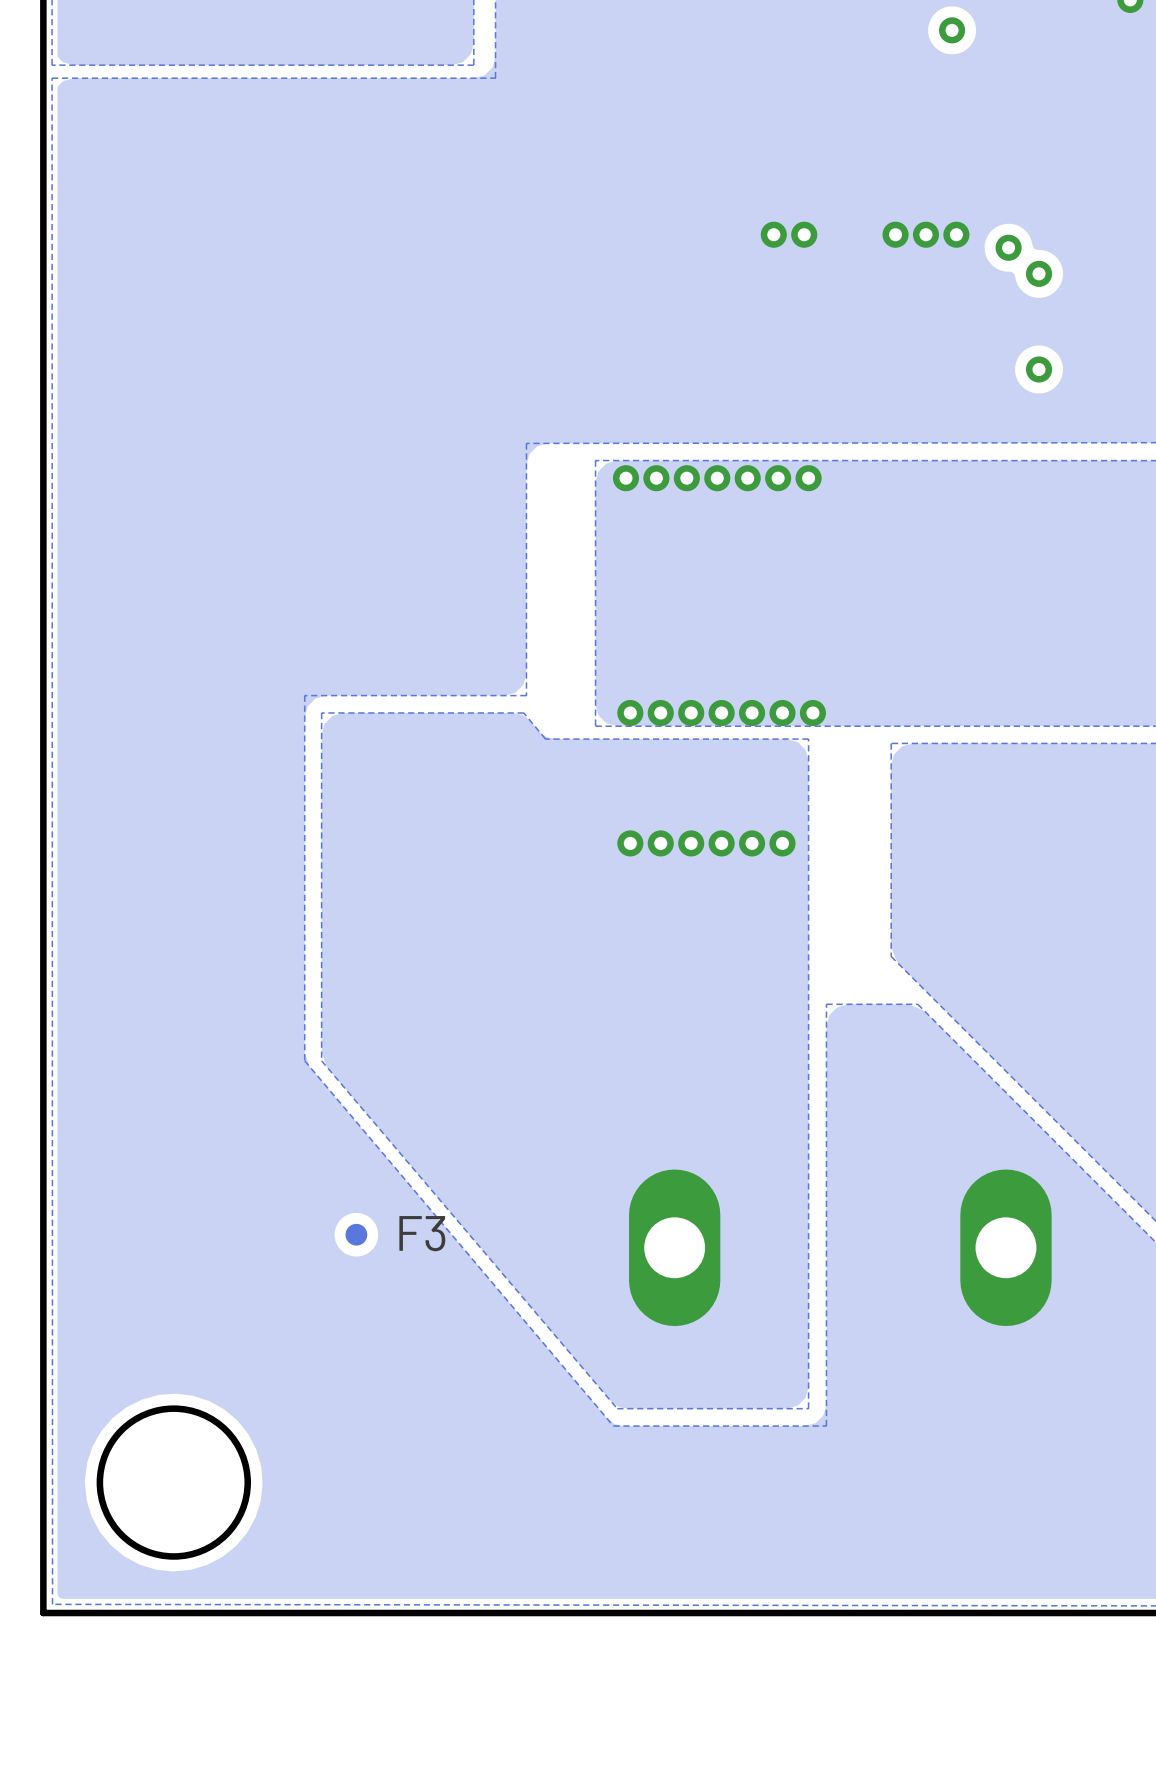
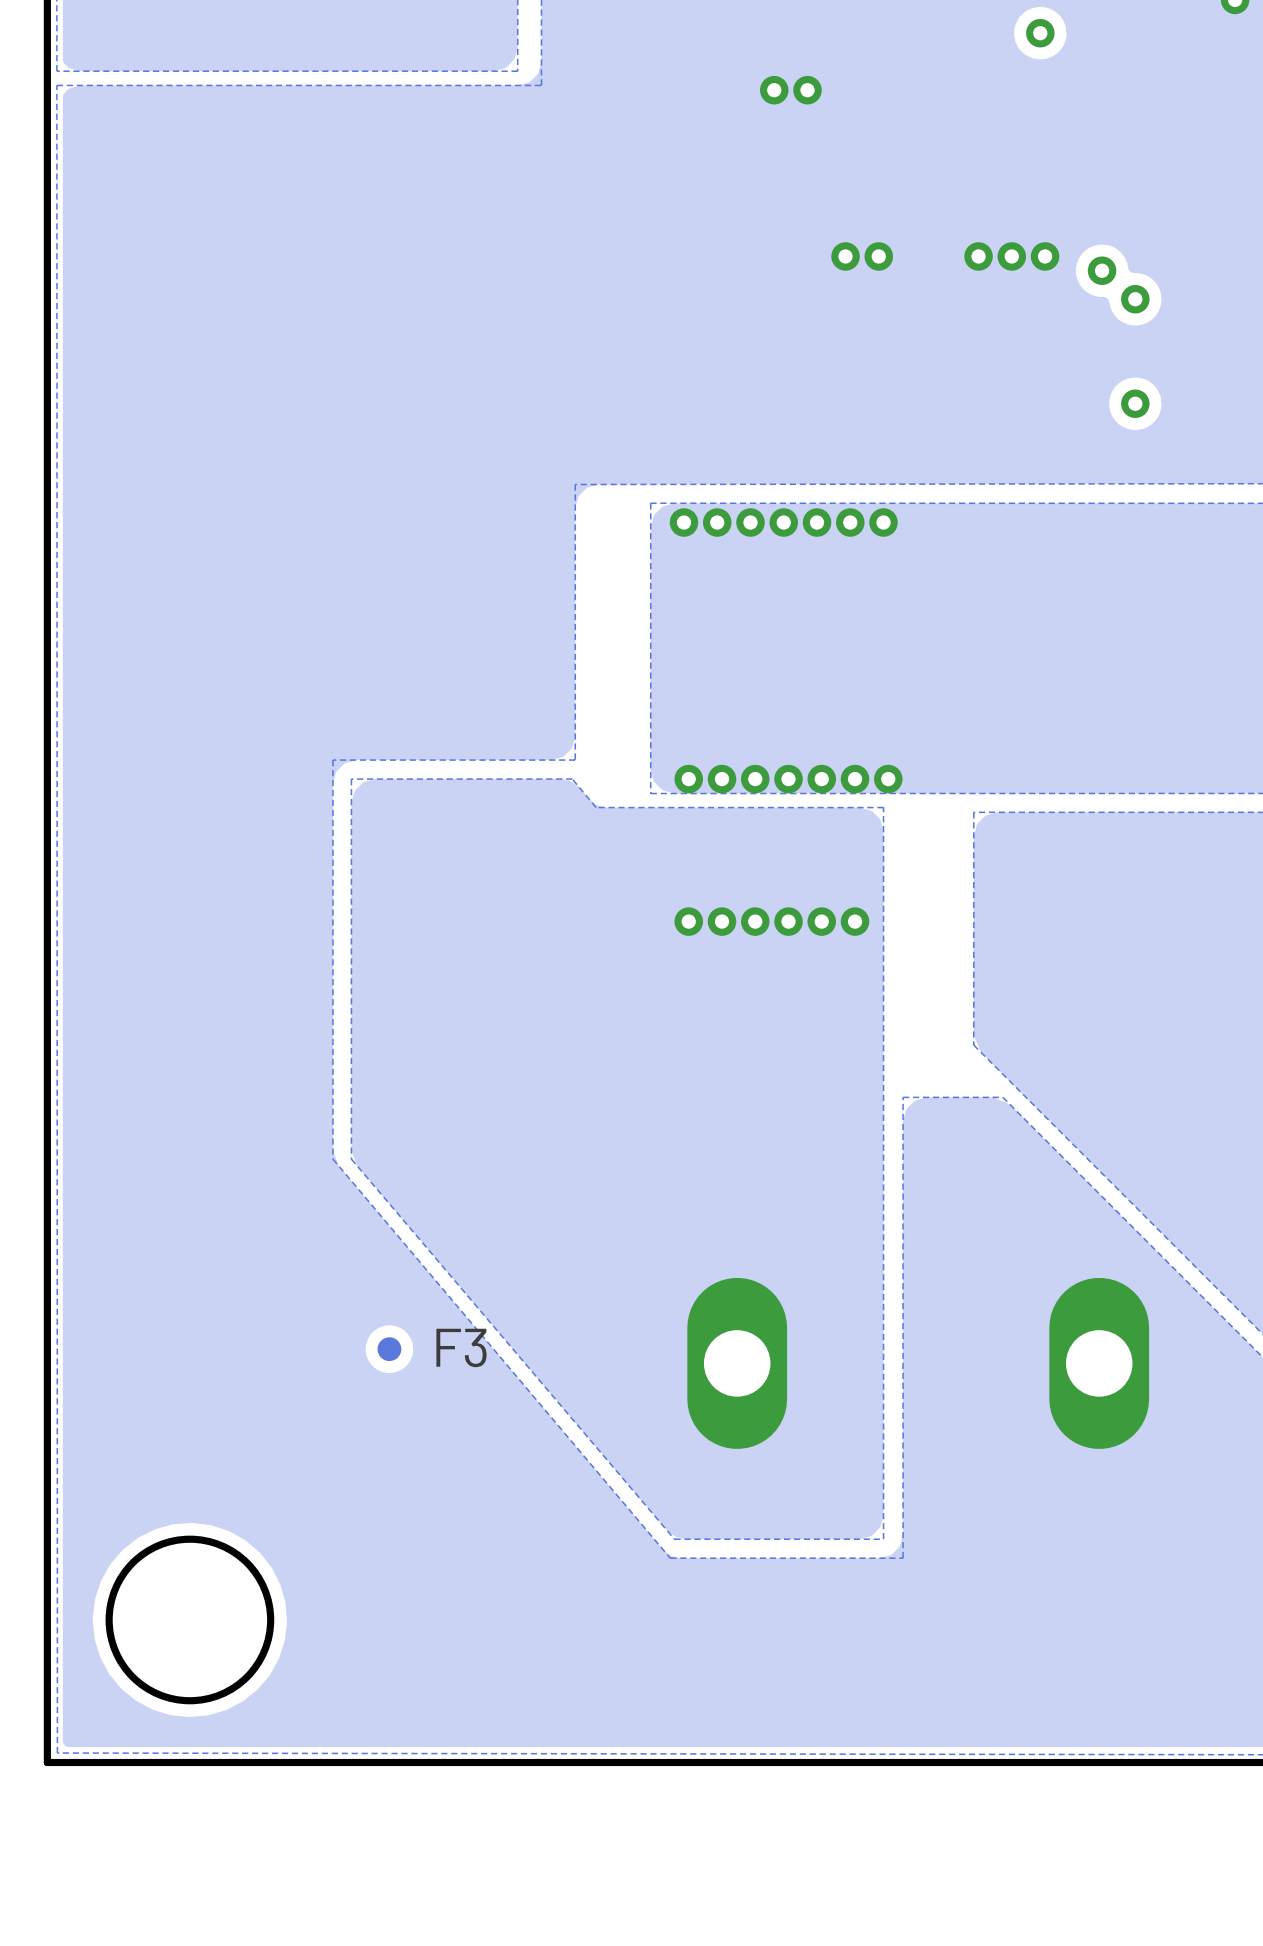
via: none -> (774, 90)
via: none -> (807, 90)

